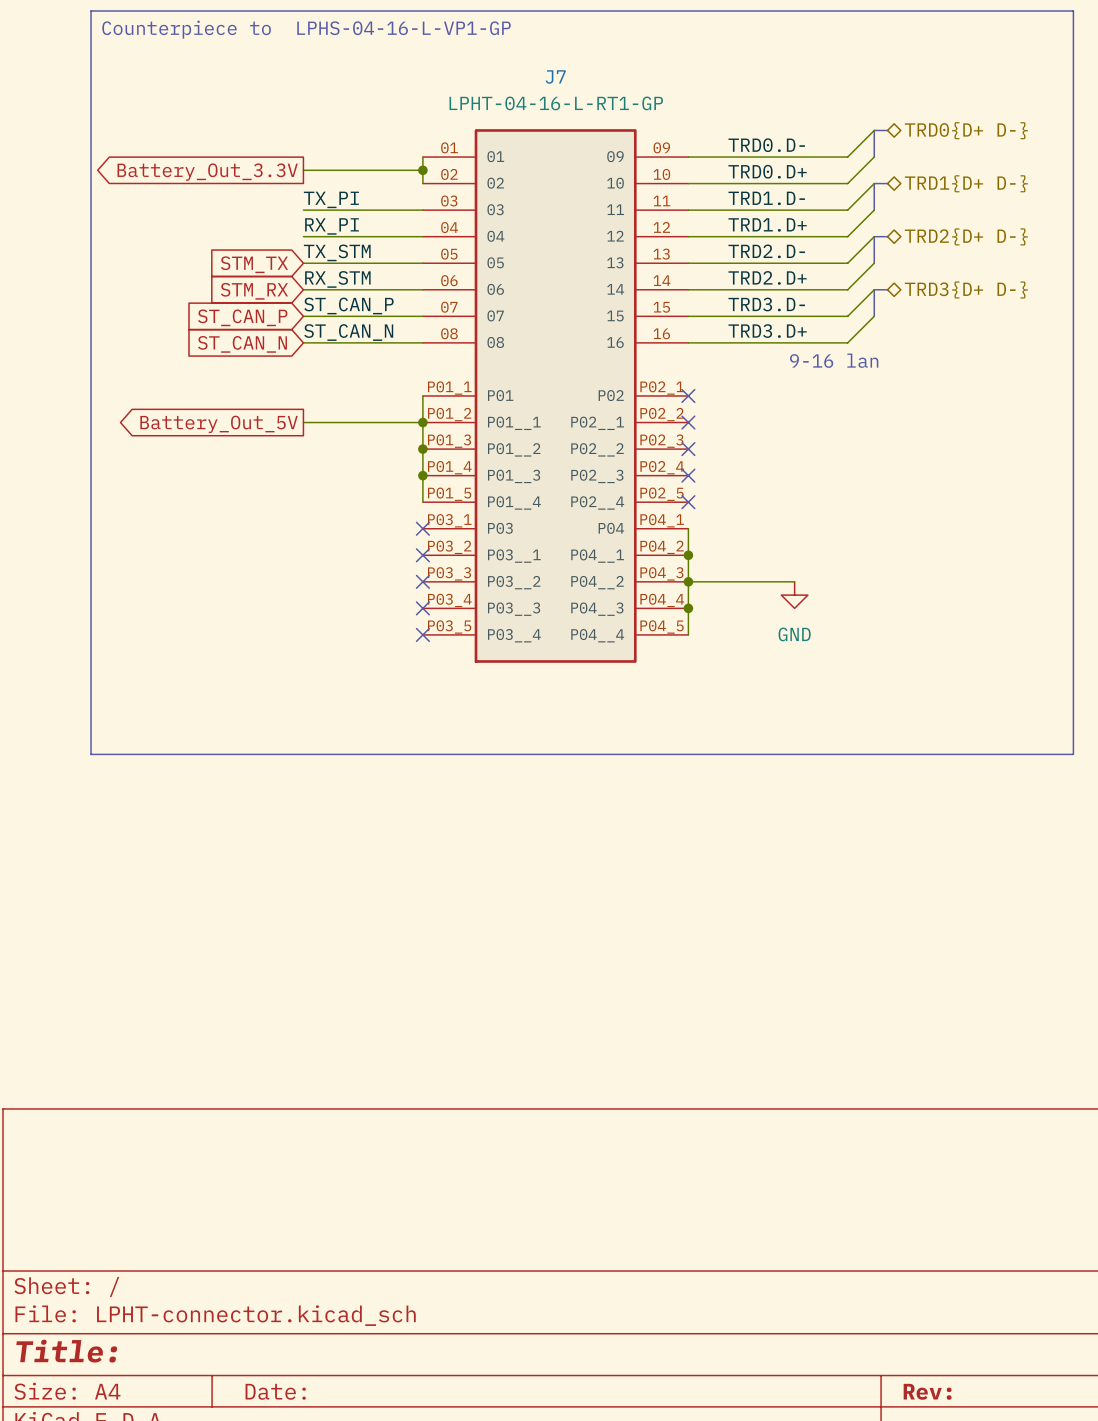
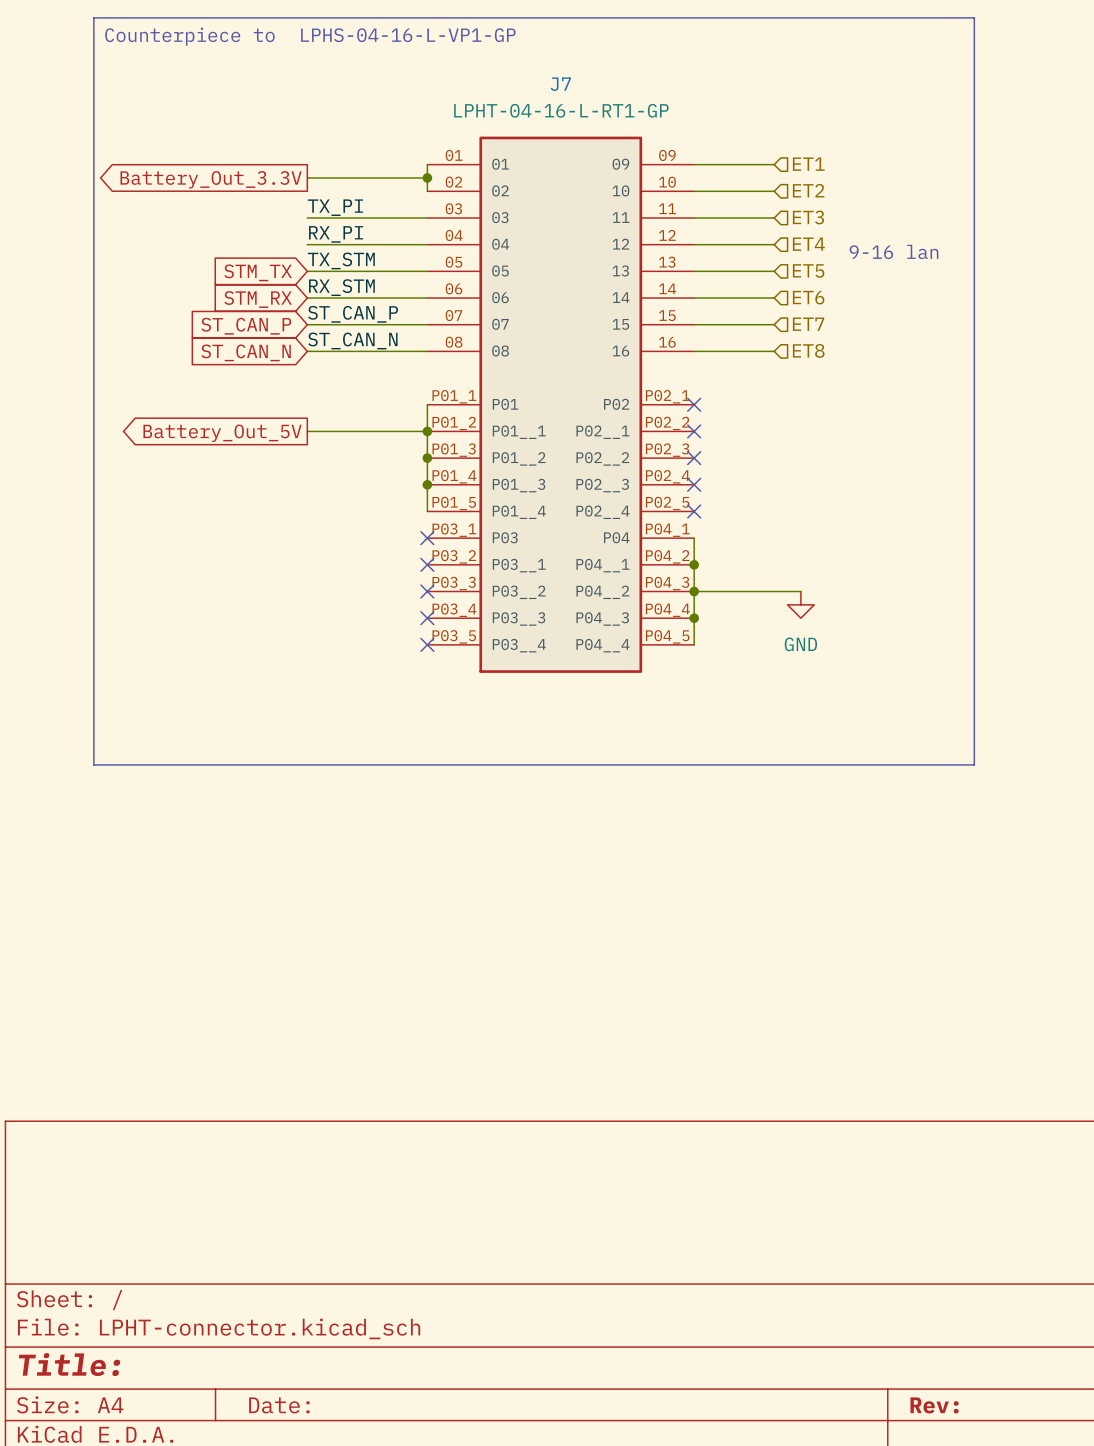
line: (967, 11) (1073, 11) (1073, 754) (967, 754) -> (974, 17) (974, 764)
wire: (874, 130) (847, 157) (768, 157) -> none
bus: (887, 130) (874, 130) (874, 157) -> none
hierarchical label: TRD0{D+ D-} (966, 130) -> none
label: TRD0.D- (766, 145) -> none
hierarchical label: none -> ET1 (808, 164)
wire: (874, 157) (847, 183) (768, 183) -> none
label: TRD0.D+ (767, 171) -> none
hierarchical label: none -> ET2 (808, 190)
wire: (874, 183) (847, 210) (768, 210) -> none
bus: (887, 183) (874, 183) (874, 210) -> none
hierarchical label: TRD1{D+ D-} (966, 183) -> none
label: TRD1.D- (766, 198) -> none
hierarchical label: none -> ET3 (808, 217)
wire: (874, 210) (847, 236) (768, 236) -> none
label: TRD1.D+ (767, 224) -> none
hierarchical label: none -> ET4 (808, 244)
wire: (874, 236) (847, 263) (768, 263) -> none
bus: (887, 236) (874, 236) (874, 263) -> none
hierarchical label: TRD2{D+ D-} (966, 236) -> none
label: TRD2.D- (766, 251) -> none
hierarchical label: none -> ET5 (808, 270)
wire: (874, 263) (847, 289) (768, 289) -> none
label: TRD2.D+ (767, 277) -> none
hierarchical label: none -> ET6 (808, 297)
wire: (874, 289) (847, 316) (768, 316) -> none
bus: (887, 289) (874, 289) (874, 316) -> none
hierarchical label: TRD3{D+ D-} (966, 290) -> none
label: TRD3.D- (766, 304) -> none
hierarchical label: none -> ET7 (808, 324)
wire: (874, 316) (847, 342) (768, 342) -> none
label: TRD3.D+ (767, 331) -> none
hierarchical label: none -> ET8 (808, 350)
text position: 9-16 lan (834, 360) -> 9-16 lan (894, 251)

